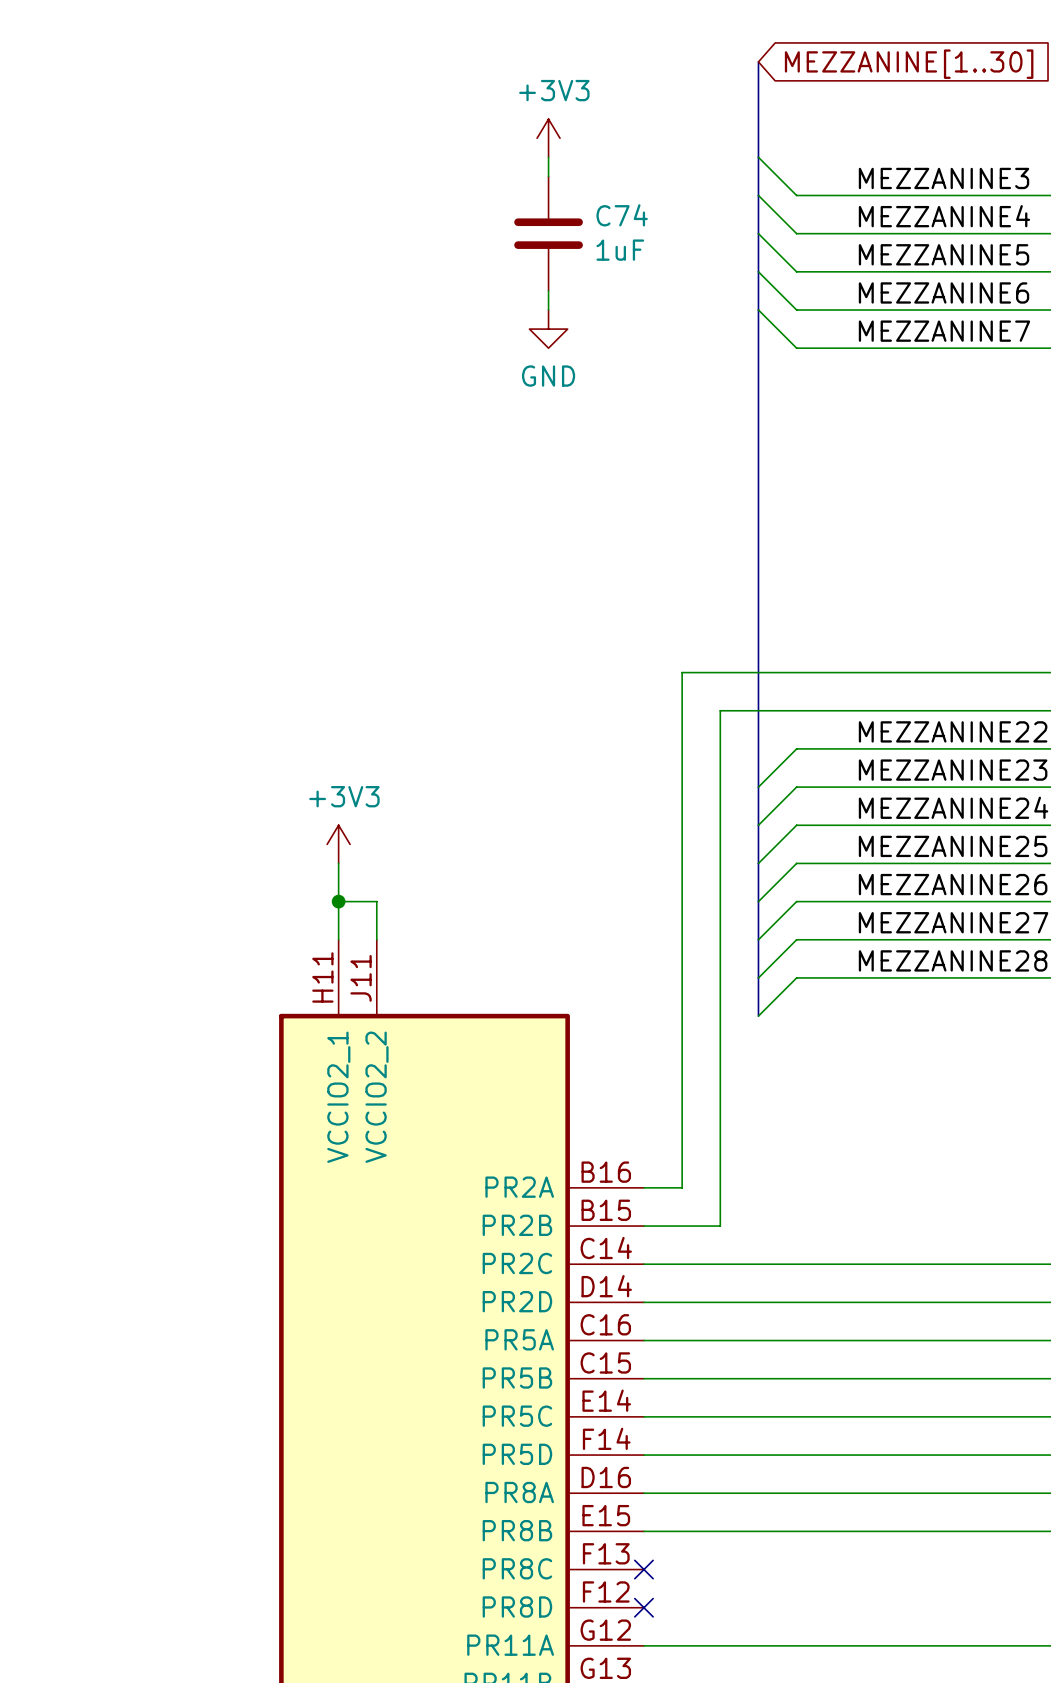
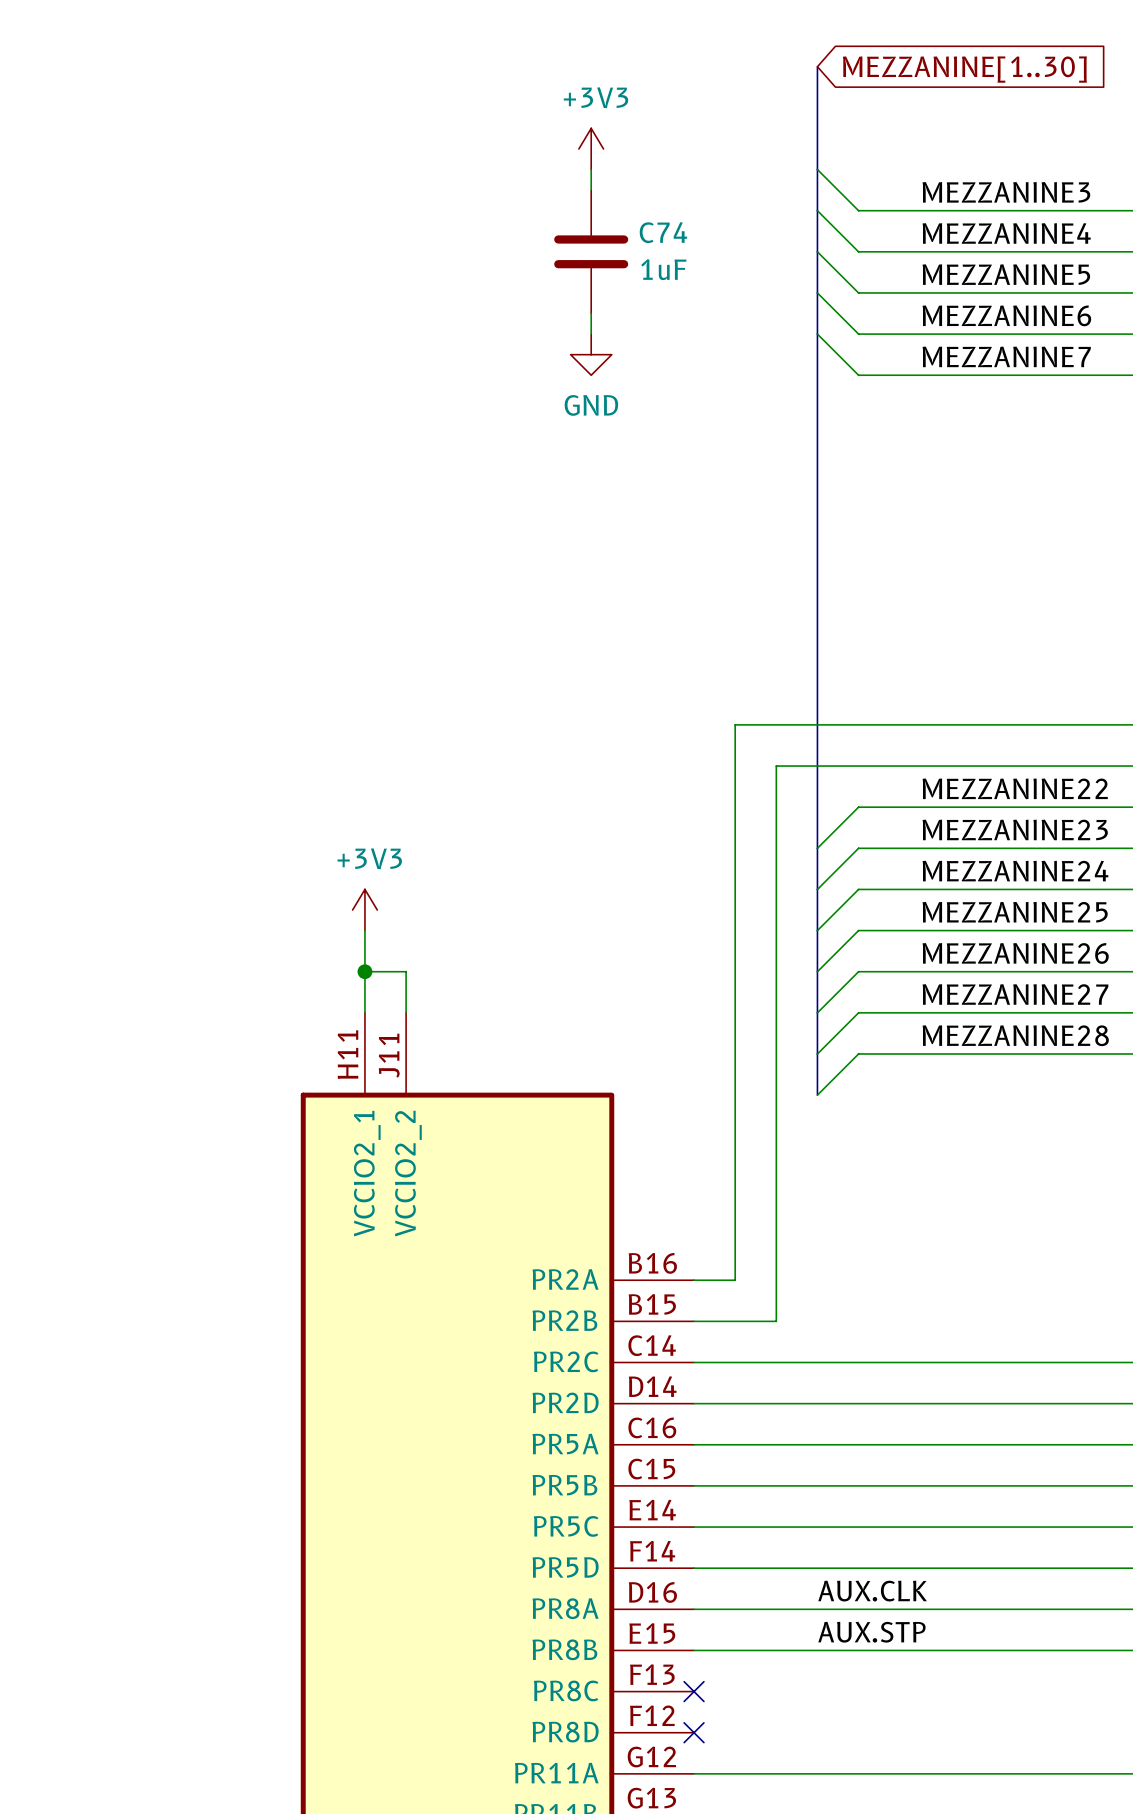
label: none -> AUX.CLK (872, 1591)
label: none -> AUX.STP (871, 1632)

